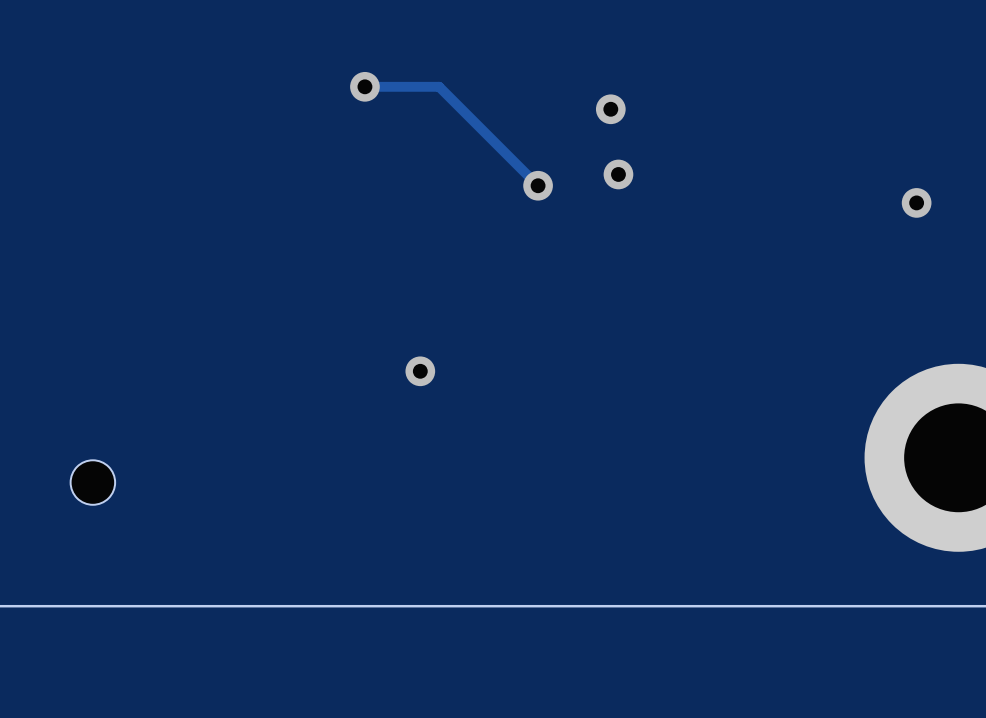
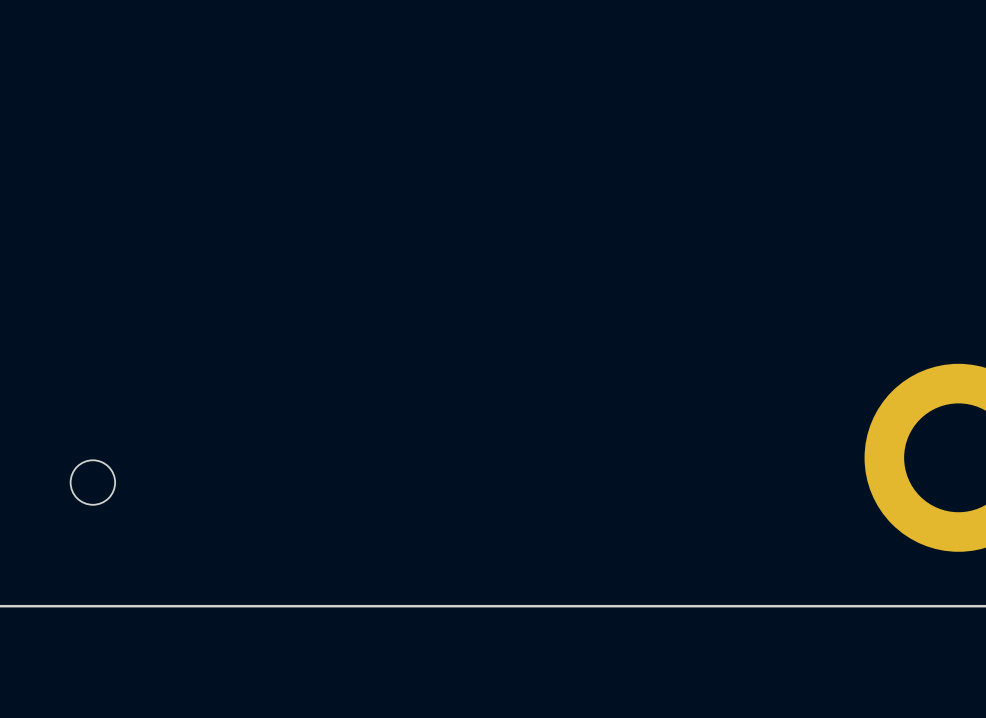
track: (364, 86) (439, 86) (538, 185) -> none
via: (364, 86) -> none
via: (610, 109) -> none
via: (618, 174) -> none
via: (538, 185) -> none
via: (916, 202) -> none
via: (420, 371) -> none

